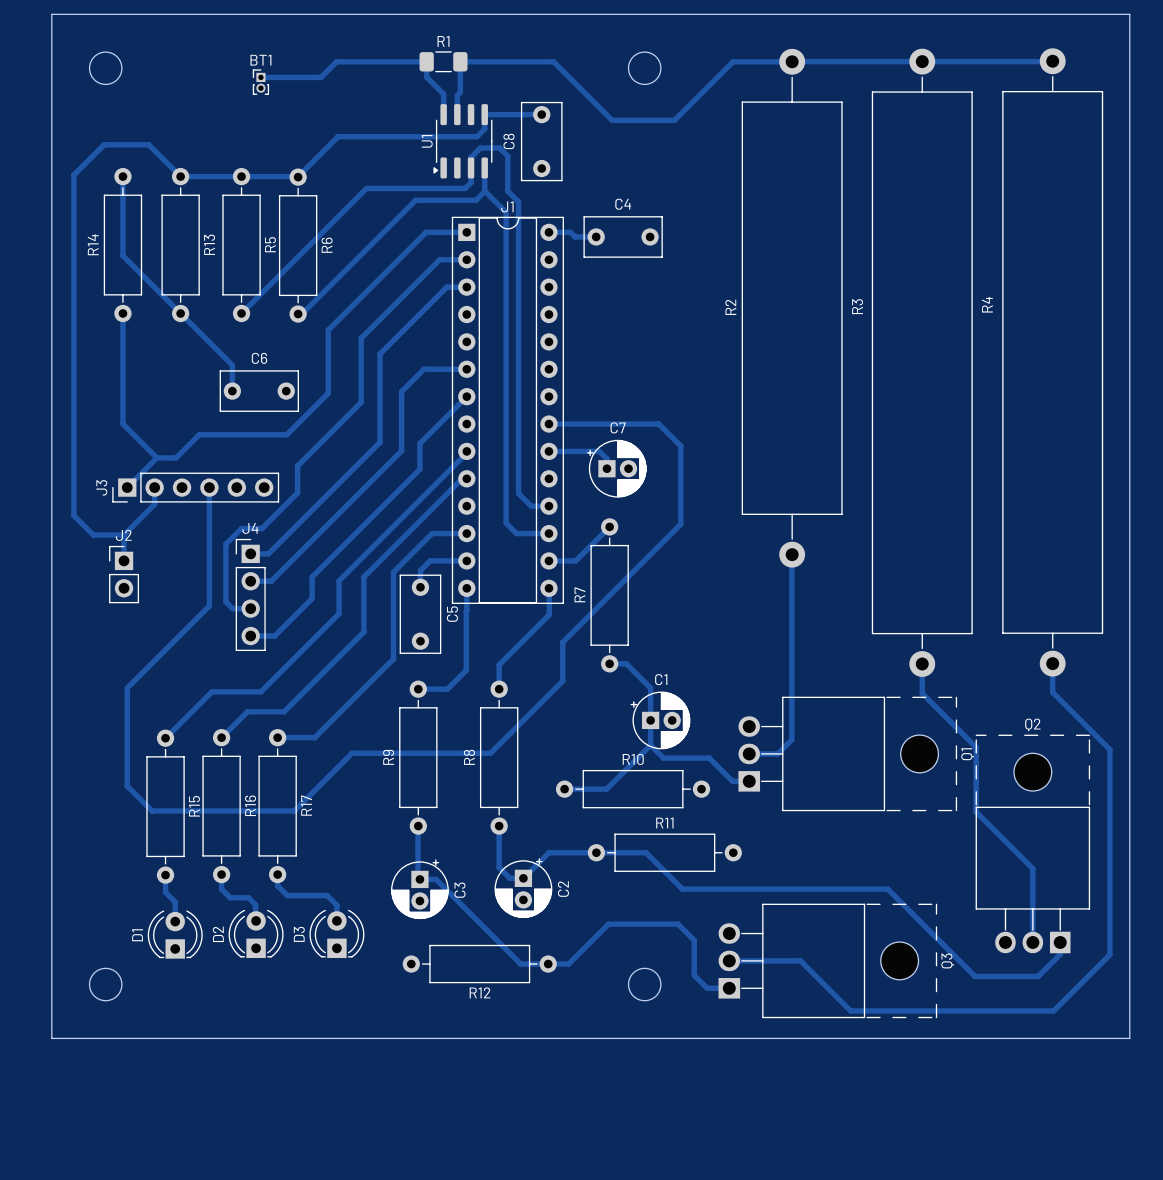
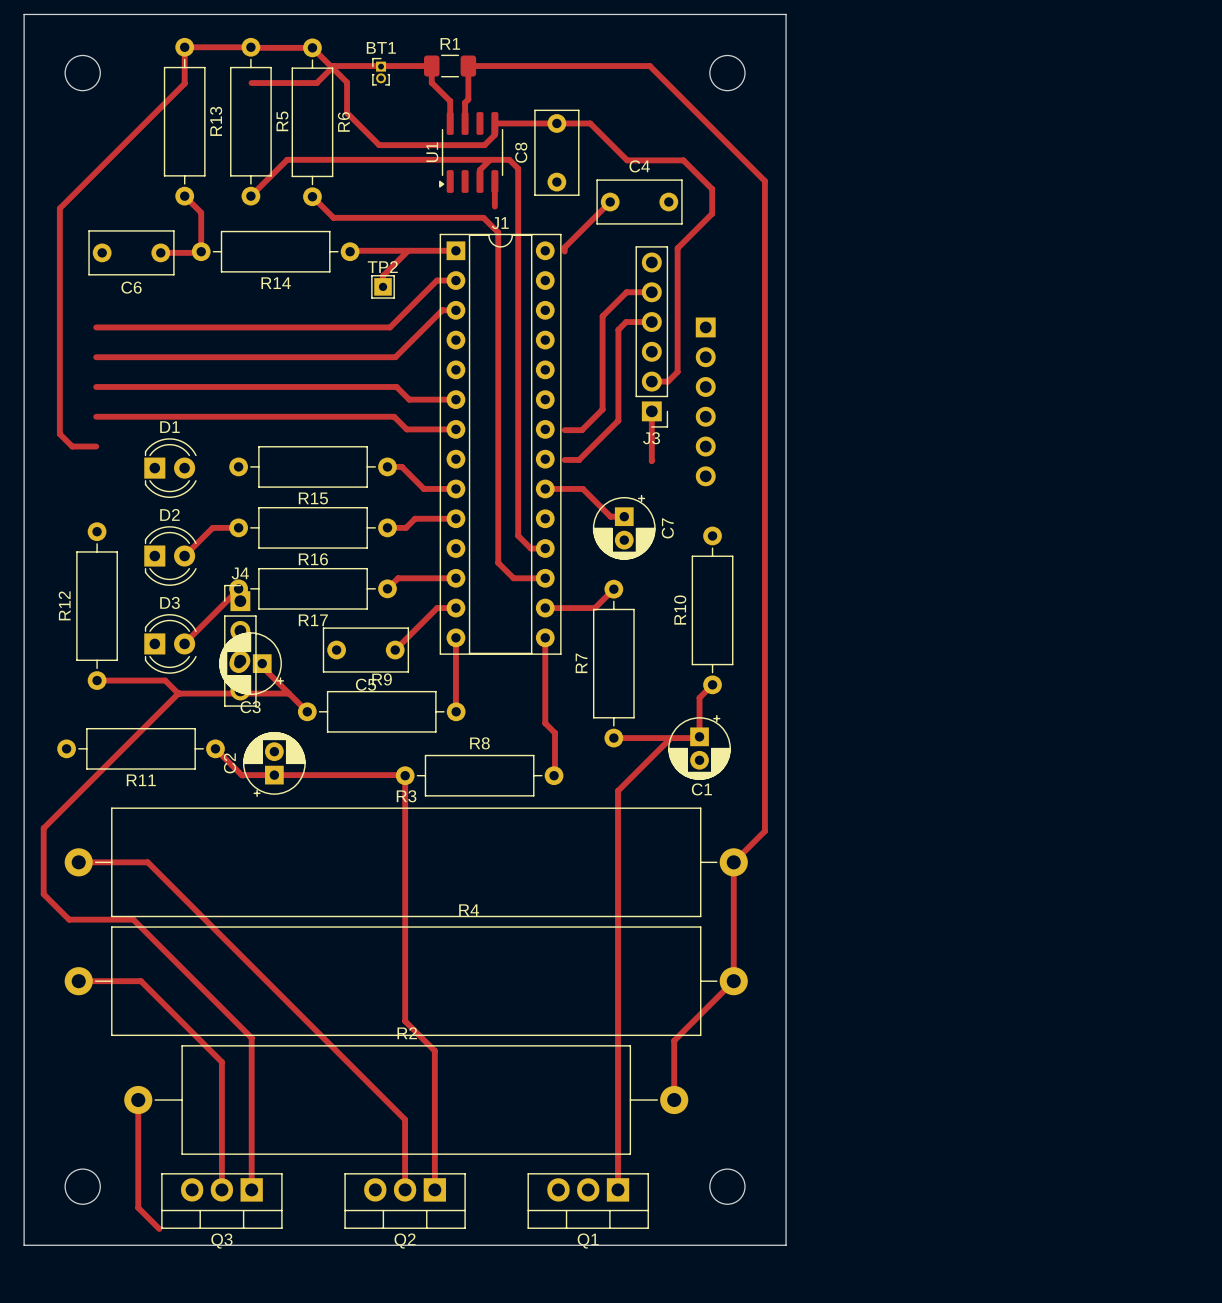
board edge: (752, 14) (1129, 14) (1129, 1038) (51, 1038) -> (786, 14) (786, 1245) (24, 1245) (24, 1128)
track: (1052, 61) (733, 61) (674, 120) (612, 120) (553, 61) -> (674, 1100) (674, 1040) (733, 981) (733, 862) (764, 831) (764, 181) (649, 66) (569, 66)
round board edge position: (644, 68) -> (727, 73)
BT1 position: (260, 82) -> (381, 71)
track: none -> (556, 123) (590, 123) (627, 160) (683, 160) (712, 189) (712, 213) (677, 248) (677, 371) (668, 381) (651, 381)
track: (484, 125) (484, 129) (477, 136) (338, 136) (298, 177) (180, 176) (148, 144) (104, 144) (73, 174) (73, 515) (93, 535) (124, 535) -> (494, 134) (484, 145) (379, 145) (347, 112) (347, 82) (312, 47) (184, 47) (184, 83) (59, 208) (59, 434) (72, 446) (96, 446)
track: none -> (490, 159) (287, 159) (250, 196)
track: (498, 148) (507, 156) (507, 191) (518, 201) (518, 493) (531, 506) (548, 506) -> none
track: (471, 167) (471, 182) (465, 188) (366, 188) (241, 313) -> none
track: (122, 176) (122, 255) (232, 365) (232, 391) -> none
track: none -> (184, 196) (201, 212) (201, 251) (160, 252)
track: none -> (312, 196) (333, 217) (483, 217) (498, 232) (498, 562) (513, 578) (545, 578)
track: (506, 212) (484, 191) (475, 200) (415, 200) (301, 314) (298, 314) -> (518, 229) (518, 168) (509, 159)
track: none -> (408, 250) (383, 275) (383, 286)
track: none -> (455, 250) (350, 251)
track: (466, 232) (426, 232) (328, 330) (328, 393) (286, 434) (199, 434) (176, 457) (156, 457) -> none
track: (548, 232) (570, 232) (575, 236) (596, 236) -> (564, 251) (564, 247) (610, 202)
C4 position: (623, 236) -> (639, 202)
R14 name position: R14 (93, 244) -> R14 (276, 283)
R14 rotation: 0° (122, 245) -> 90° clockwise (275, 251)
R14 position: (122, 245) -> (275, 251)
R13 position: (180, 245) -> (184, 121)
R5 position: (241, 245) -> (250, 121)
R6 position: (298, 245) -> (312, 122)
track: none -> (455, 280) (436, 280) (390, 327) (96, 327)
track: (466, 259) (439, 259) (361, 338) (361, 402) (297, 466) (297, 492) (262, 528) (241, 528) (225, 544) (225, 601) (232, 608) (250, 608) -> none
TP2: none -> (383, 286)
track: none -> (651, 292) (626, 292) (602, 316) (602, 409) (581, 430) (564, 430)
track: none -> (455, 310) (442, 310) (395, 357) (96, 357)
track: (466, 287) (446, 287) (380, 353) (380, 442) (268, 553) (250, 553) -> none
R3 name position: R3 (857, 306) -> R3 (406, 796)
R2 rotation: 0° (792, 308) -> 90° clockwise (406, 1100)
R2 position: (792, 308) -> (406, 1100)
track: (122, 313) (122, 423) (156, 457) -> none
track: none -> (96, 386) (396, 386) (409, 399) (455, 399)
C6 name position: C6 (259, 358) -> C6 (131, 287)
R3 rotation: 0° (922, 362) -> 90° clockwise (406, 862)
R3 position: (922, 362) -> (406, 862)
R4 rotation: 0° (1052, 362) -> 90° clockwise (406, 981)
R4 position: (1052, 362) -> (406, 981)
track: (466, 369) (423, 369) (401, 391) (401, 450) (271, 581) (250, 581) -> none
part: none -> (705, 401)
track: none -> (651, 411) (651, 460)
track: none -> (96, 416) (394, 416) (406, 429) (455, 429)
C6 position: (259, 391) -> (131, 252)
track: (466, 396) (419, 443) (419, 469) (312, 577) (312, 598) (274, 636) (250, 636) -> none
J1 position: (507, 410) -> (500, 444)
track: (562, 424) (658, 424) (680, 446) (680, 524) (562, 642) (562, 681) (490, 753) (352, 753) (294, 810) (152, 810) (127, 786) (127, 688) (209, 605) (209, 487) -> (579, 459) (618, 420) (618, 329) (626, 322) (651, 322)
track: none -> (387, 466) (401, 466) (423, 488) (455, 488)
track: none -> (545, 488) (582, 488) (610, 516) (624, 516)
track: (466, 451) (339, 580) (339, 613) (260, 691) (211, 691) (165, 738) -> none
track: (548, 451) (599, 451) (606, 459) (606, 468) -> none
track: (156, 457) (127, 487) -> none
C7 rotation: 0° (616, 468) -> 90° clockwise (624, 527)
track: none -> (455, 518) (415, 518) (406, 527) (387, 527)
track: (466, 478) (462, 478) (363, 577) (363, 632) (284, 711) (247, 711) (221, 737) -> none
track: none -> (239, 527) (212, 527) (184, 556)
track: (154, 487) (154, 504) (124, 535) -> none
J3 rotation: 0° (195, 487) -> 90° counterclockwise (651, 336)
J3 position: (195, 487) -> (651, 336)
track: (506, 493) (506, 523) (516, 533) (548, 533) -> (518, 535) (530, 548) (545, 548)
track: (609, 526) (575, 560) (548, 560) -> none
track: none -> (455, 578) (398, 578) (387, 588)
track: (466, 533) (432, 533) (393, 572) (393, 658) (314, 737) (277, 737) -> none
track: (124, 535) (124, 560) -> none
track: none -> (239, 588) (184, 643)
track: none -> (613, 589) (594, 608) (545, 608)
track: (792, 554) (791, 739) (777, 753) (749, 753) -> none
track: none -> (455, 608) (437, 608) (395, 650)
track: (466, 560) (430, 560) (420, 570) (420, 587) -> none
J2: (124, 574) -> none
track: none -> (455, 637) (456, 711)
track: none -> (545, 637) (545, 723) (555, 733) (554, 775)
track: (466, 588) (466, 670) (447, 689) (418, 689) -> none
track: (548, 588) (549, 614) (499, 664) (499, 689) -> none
R7 position: (609, 595) -> (613, 663)
track: none -> (262, 663) (262, 666) (307, 711)
C5 rotation: 0° (420, 614) -> 90° clockwise (365, 650)
C5 position: (420, 614) -> (365, 650)
track: none -> (97, 680) (165, 680) (178, 693)
track: none -> (712, 684) (699, 697) (698, 738) (613, 738)
track: none -> (178, 693) (43, 828) (43, 894) (69, 919) (133, 919) (251, 1037) (251, 1189)
track: none -> (180, 693) (289, 693)
track: (609, 663) (626, 663) (650, 688) (650, 745) -> none
track: (922, 663) (922, 693) (976, 747) (976, 812) (1032, 868) (1032, 942) -> none
track: (1052, 663) (1052, 692) (1109, 749) (1109, 954) (1053, 1010) (850, 1010) (800, 960) (729, 960) -> none
track: none -> (670, 738) (618, 790) (618, 1189)
C1 name position: C1 (661, 679) -> C1 (701, 789)
track: none -> (215, 748) (241, 775) (405, 776)
Q1 footprint: [738, 696, 958, 812] -> [527, 1173, 649, 1229]
track: none -> (405, 775) (405, 1021) (434, 1050) (434, 1189)
C1 rotation: 0° (660, 720) -> 90° clockwise (699, 747)
Q2 name position: Q2 (1032, 724) -> Q2 (405, 1241)
Q2 footprint: [975, 734, 1091, 954] -> [344, 1173, 466, 1229]
track: (650, 745) (606, 789) (564, 789) -> none
track: (650, 745) (663, 758) (709, 758) (732, 781) (749, 781) -> none
Q1 name position: Q1 (967, 754) -> Q1 (588, 1241)
R9 rotation: 0° (418, 757) -> 90° clockwise (381, 711)
R9 position: (418, 757) -> (381, 711)
R8 rotation: 0° (499, 757) -> 90° clockwise (479, 775)
R10 name position: R10 (633, 759) -> R10 (680, 610)
R10 rotation: 0° (633, 789) -> 90° clockwise (712, 610)
R10 position: (633, 789) -> (712, 610)
track: none -> (78, 862) (147, 862) (405, 1119) (405, 1189)
R15 rotation: 0° (165, 806) -> 90° clockwise (313, 466)
R15 position: (165, 806) -> (313, 466)
R16 rotation: 0° (221, 806) -> 90° clockwise (313, 527)
R16 position: (221, 806) -> (313, 527)
R17 rotation: 0° (277, 806) -> 90° clockwise (313, 588)
R17 position: (277, 806) -> (313, 588)
R11 name position: R11 (664, 823) -> R11 (141, 780)
track: (418, 826) (417, 877) (419, 879) (436, 879) (520, 964) (568, 964) (608, 924) (678, 924) (694, 940) (694, 975) (707, 988) (729, 988) -> none
track: (499, 826) (499, 867) (509, 878) (523, 878) (549, 852) (646, 852) (682, 889) (887, 889) (975, 976) (1038, 976) (1060, 954) (1060, 942) -> none
R11 position: (664, 852) -> (141, 748)
track: (221, 874) (221, 889) (230, 897) (248, 897) (255, 904) (256, 920) -> none
track: (277, 874) (277, 885) (287, 895) (327, 895) (336, 905) (336, 920) -> none
track: (165, 875) (165, 892) (175, 902) (175, 921) -> none
C2 rotation: 0° (523, 888) -> 180° (274, 764)
C2 position: (523, 888) -> (274, 764)
C3 rotation: 0° (419, 889) -> 90° clockwise (251, 663)
C3 position: (419, 889) -> (251, 663)
track: none -> (78, 981) (140, 981) (221, 1062) (221, 1189)
Q3 footprint: [718, 903, 938, 1019] -> [161, 1173, 283, 1229]
D2 rotation: 0° (256, 933) -> 90° clockwise (170, 556)
D2 position: (256, 933) -> (170, 556)
D3 rotation: 0° (336, 933) -> 90° clockwise (170, 643)
D3 position: (336, 933) -> (170, 643)
D1 rotation: 0° (175, 934) -> 90° clockwise (170, 468)
D1 position: (175, 934) -> (170, 468)
Q3 name position: Q3 (947, 960) -> Q3 (221, 1241)
R12 rotation: 0° (479, 964) -> 90° clockwise (97, 606)
R12 position: (479, 964) -> (97, 606)
round board edge position: (105, 984) -> (82, 1186)
round board edge position: (644, 984) -> (727, 1186)
track: none -> (138, 1100) (138, 1207) (159, 1228)

